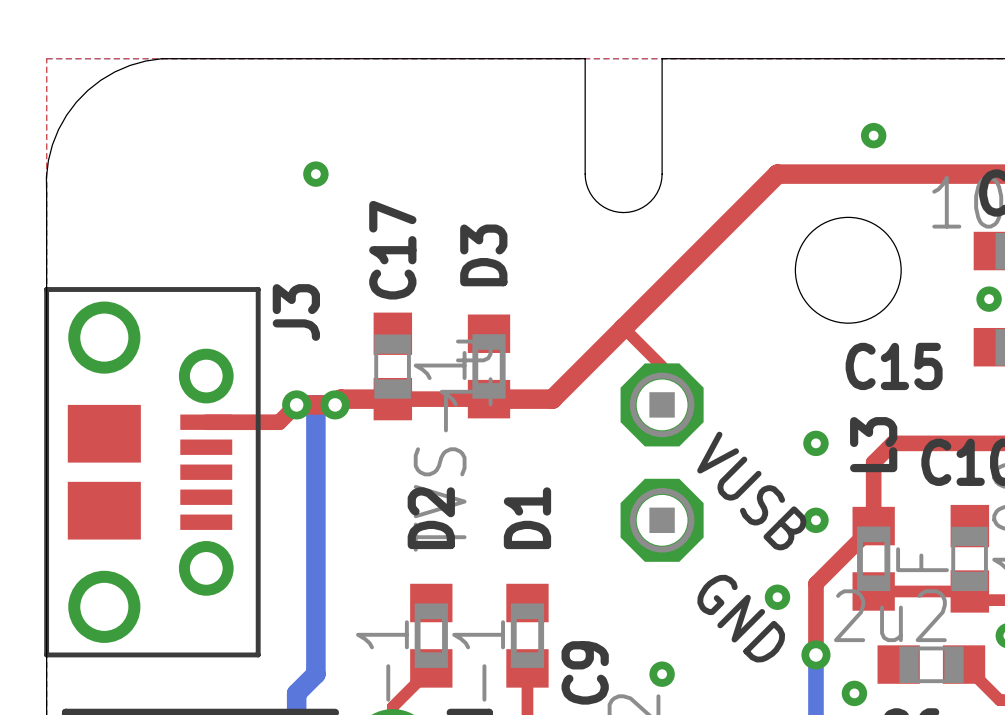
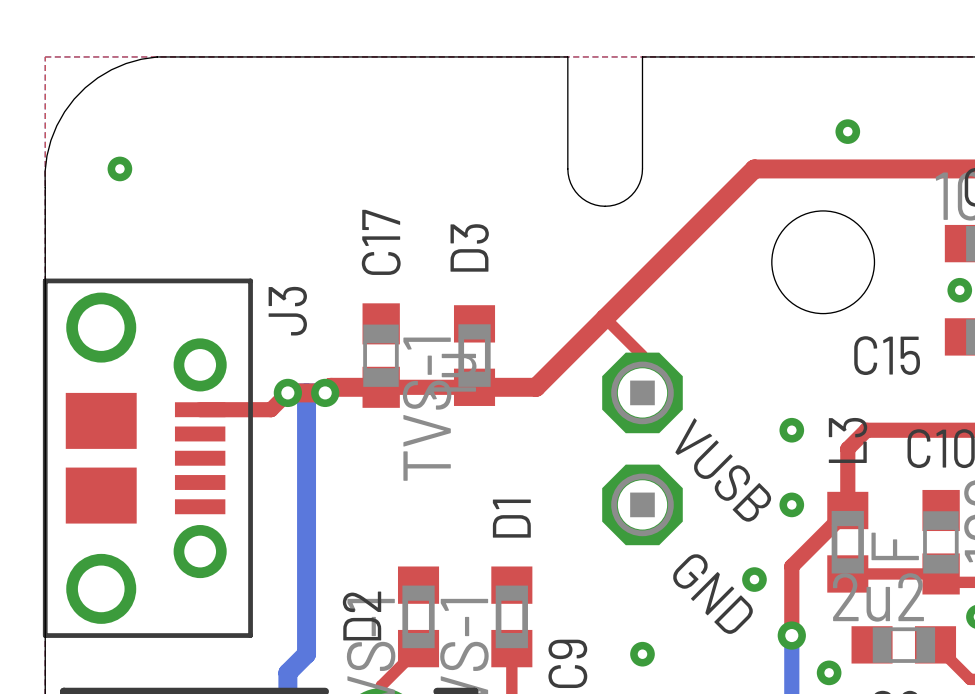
via position: (315, 174) -> (119, 168)
D2 name position: D2 (431, 518) -> D2 (362, 616)

